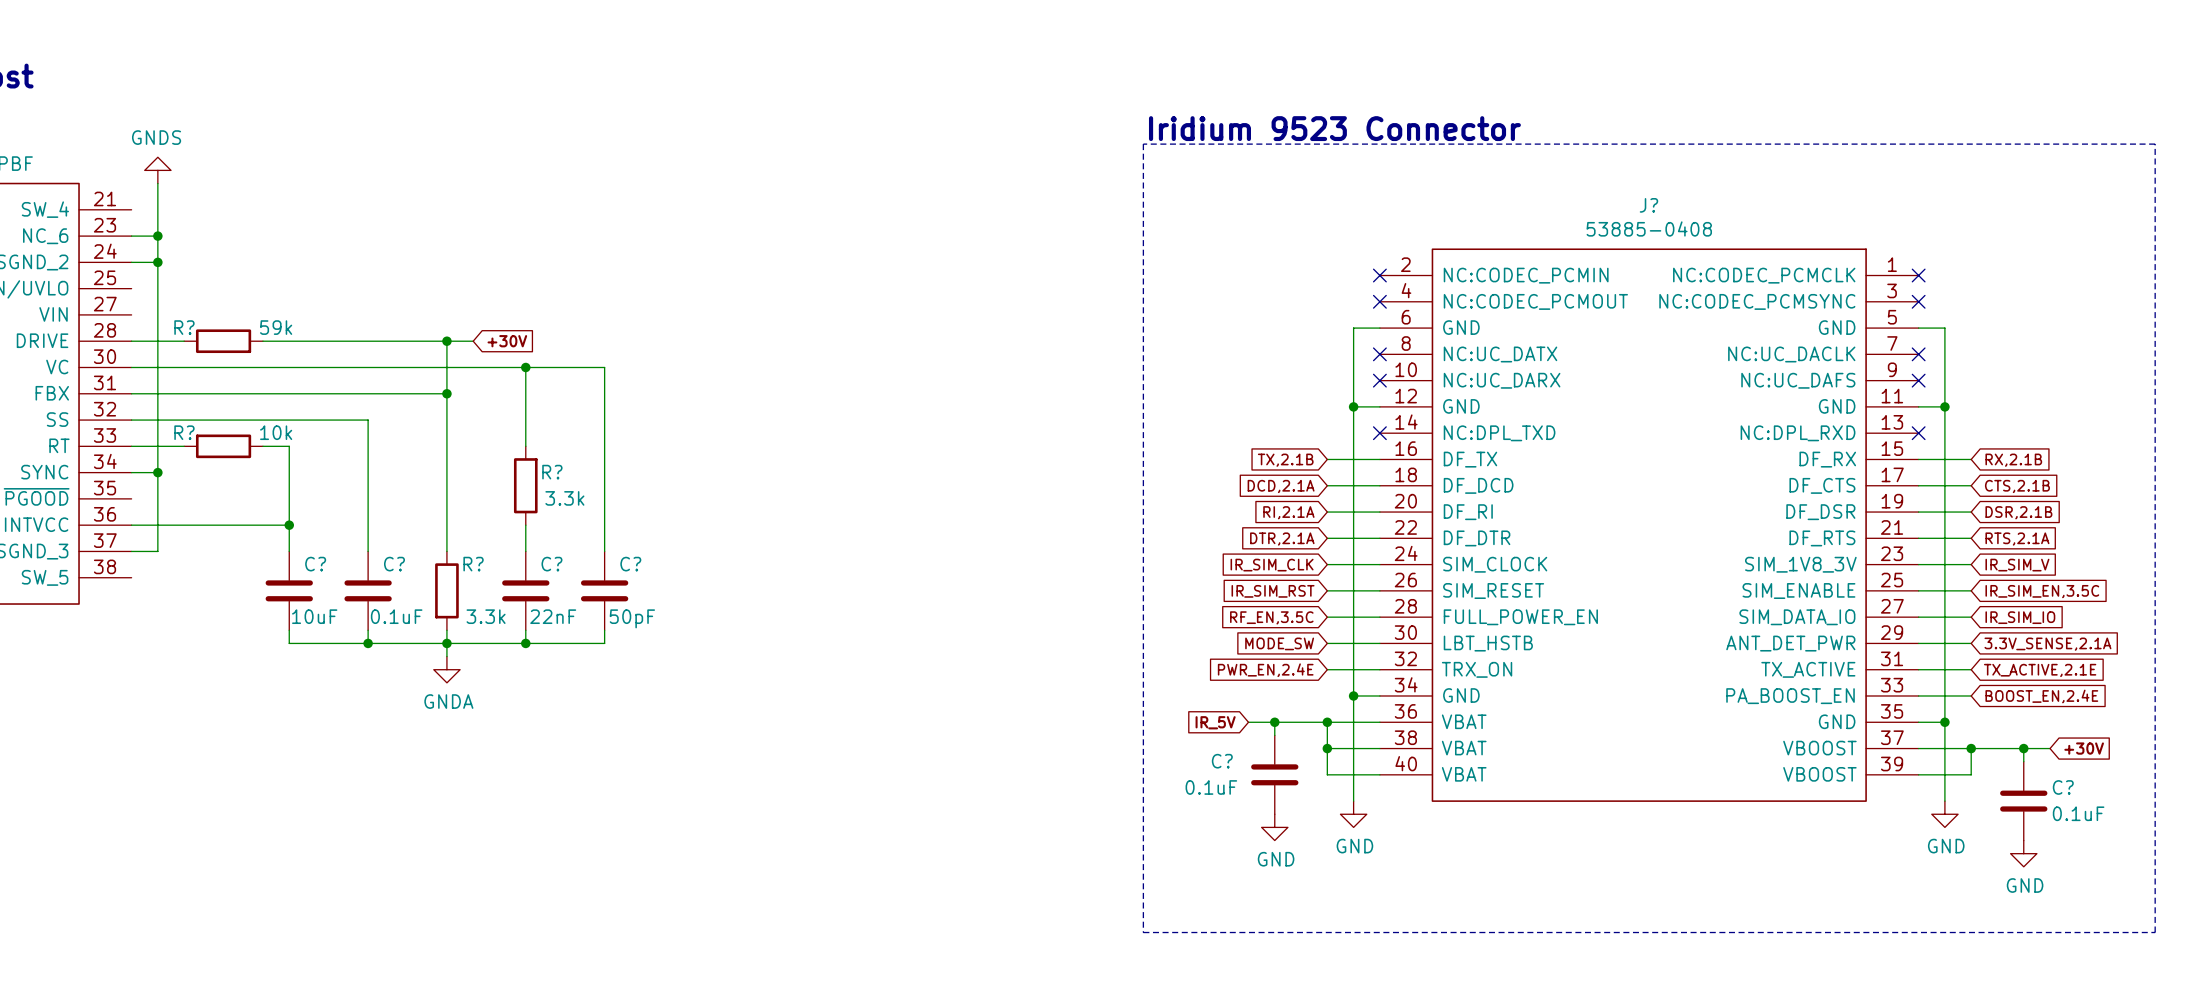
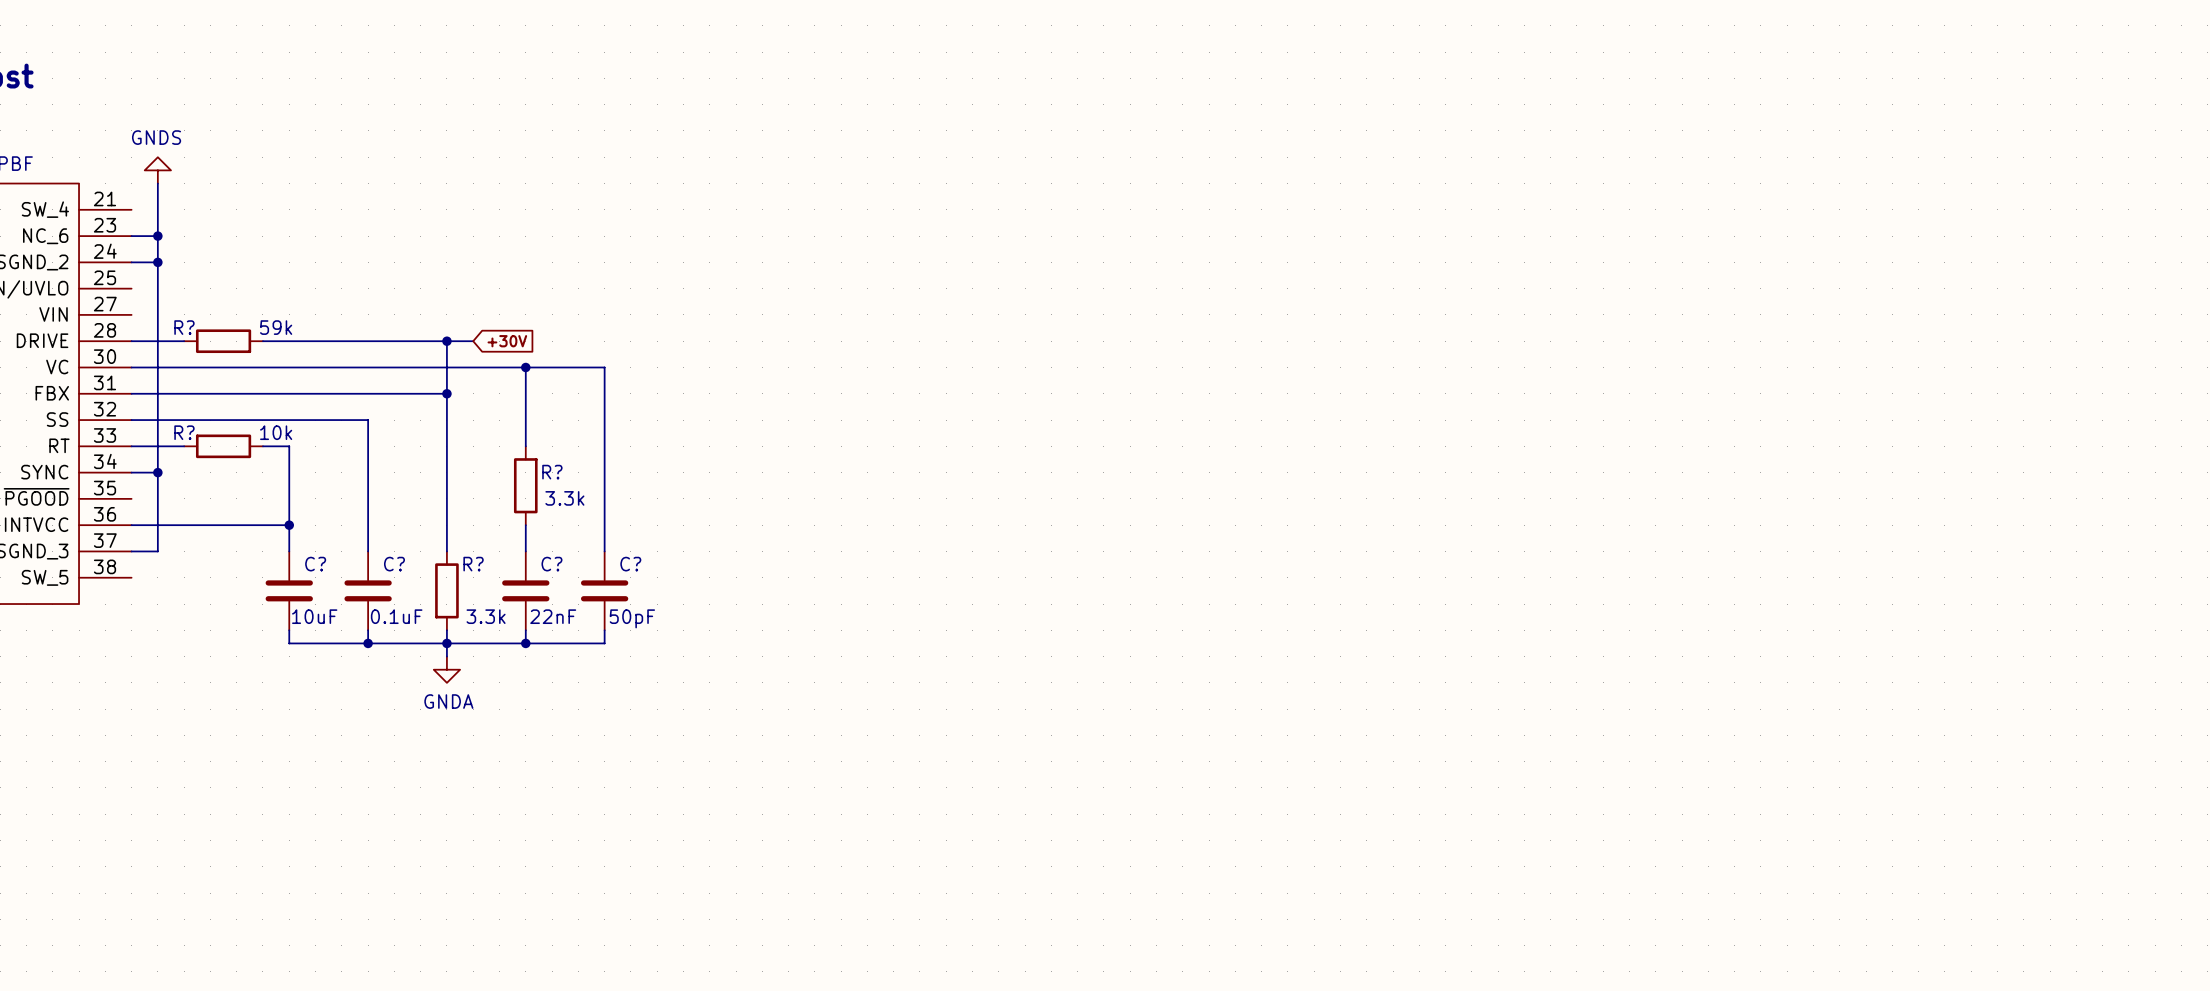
text: Iridium 9523 Connector (1334, 128) -> none
line: (1143, 144) (2155, 144) (2155, 932) (1143, 932) (1143, 144) -> none
no-connect mark: (1379, 275) -> none
no-connect mark: (1918, 275) -> none
no-connect mark: (1379, 301) -> none
no-connect mark: (1918, 301) -> none
wire: (1379, 328) (1353, 328) (1353, 801) -> none
wire: (1918, 328) (1944, 328) (1944, 801) -> none
no-connect mark: (1379, 354) -> none
no-connect mark: (1918, 354) -> none
no-connect mark: (1379, 380) -> none
no-connect mark: (1918, 380) -> none
wire: (1353, 406) (1379, 406) -> none
junction: (1353, 406) -> none
wire: (1918, 406) (1944, 406) -> none
junction: (1944, 406) -> none
no-connect mark: (1379, 433) -> none
no-connect mark: (1918, 433) -> none
wire: (1327, 459) (1379, 459) -> none
wire: (1918, 459) (1971, 459) -> none
global label: TX,2.1B (1285, 460) -> none
global label: RX,2.1B (2013, 460) -> none
wire: (1327, 485) (1379, 485) -> none
wire: (1918, 485) (1971, 485) -> none
global label: DCD,2.1A (1281, 486) -> none
global label: CTS,2.1B (2017, 486) -> none
global label: RI,2.1A (1288, 512) -> none
wire: (1327, 512) (1379, 512) -> none
wire: (1918, 512) (1971, 512) -> none
global label: DSR,2.1B (2018, 512) -> none
J?: 53885-0408 (1649, 525) -> none
wire: (1327, 538) (1379, 538) -> none
wire: (1918, 538) (1971, 538) -> none
global label: DTR,2.1A (1282, 539) -> none
global label: RTS,2.1A (2017, 539) -> none
wire: (1327, 564) (1379, 564) -> none
wire: (1918, 564) (1971, 564) -> none
global label: IR_SIM_CLK (1272, 565) -> none
global label: IR_SIM_V (2017, 565) -> none
wire: (1327, 590) (1379, 590) -> none
wire: (1918, 590) (1971, 590) -> none
global label: IR_SIM_RST (1273, 591) -> none
global label: IR_SIM_EN,3.5C (2042, 591) -> none
global label: RF_EN,3.5C (1271, 617) -> none
wire: (1327, 617) (1379, 617) -> none
wire: (1918, 617) (1971, 617) -> none
global label: IR_SIM_IO (2020, 617) -> none
global label: MODE_SW (1279, 643) -> none
wire: (1327, 643) (1379, 643) -> none
wire: (1918, 643) (1971, 643) -> none
global label: 3.3V_SENSE,2.1A (2047, 644) -> none
wire: (1327, 669) (1379, 669) -> none
wire: (1918, 669) (1971, 669) -> none
global label: PWR_EN,2.4E (1265, 670) -> none
global label: TX_ACTIVE,2.1E (2040, 670) -> none
wire: (1353, 695) (1379, 695) -> none
junction: (1353, 695) -> none
wire: (1918, 695) (1971, 695) -> none
global label: BOOST_EN,2.4E (2041, 696) -> none
global label: IR_5V (1215, 722) -> none
wire: (1248, 722) (1379, 722) -> none
wire: (1274, 722) (1274, 735) -> none
junction: (1274, 722) -> none
wire: (1327, 722) (1327, 774) (1379, 774) -> none
junction: (1327, 722) -> none
wire: (1918, 722) (1944, 722) -> none
junction: (1944, 722) -> none
wire: (1327, 748) (1379, 748) -> none
junction: (1327, 748) -> none
wire: (1918, 748) (2050, 748) -> none
wire: (1971, 748) (1971, 774) (1918, 774) -> none
junction: (1971, 748) -> none
wire: (2023, 748) (2023, 761) -> none
junction: (2023, 748) -> none
global label: +30V (2084, 748) -> none
C?: 0.1uF (1274, 774) -> none
C?: 0.1uF (2023, 801) -> none
power symbol: GND (1353, 814) -> none
power symbol: GND (1944, 814) -> none
power symbol: GND (1274, 827) -> none
power symbol: GND (2023, 853) -> none

